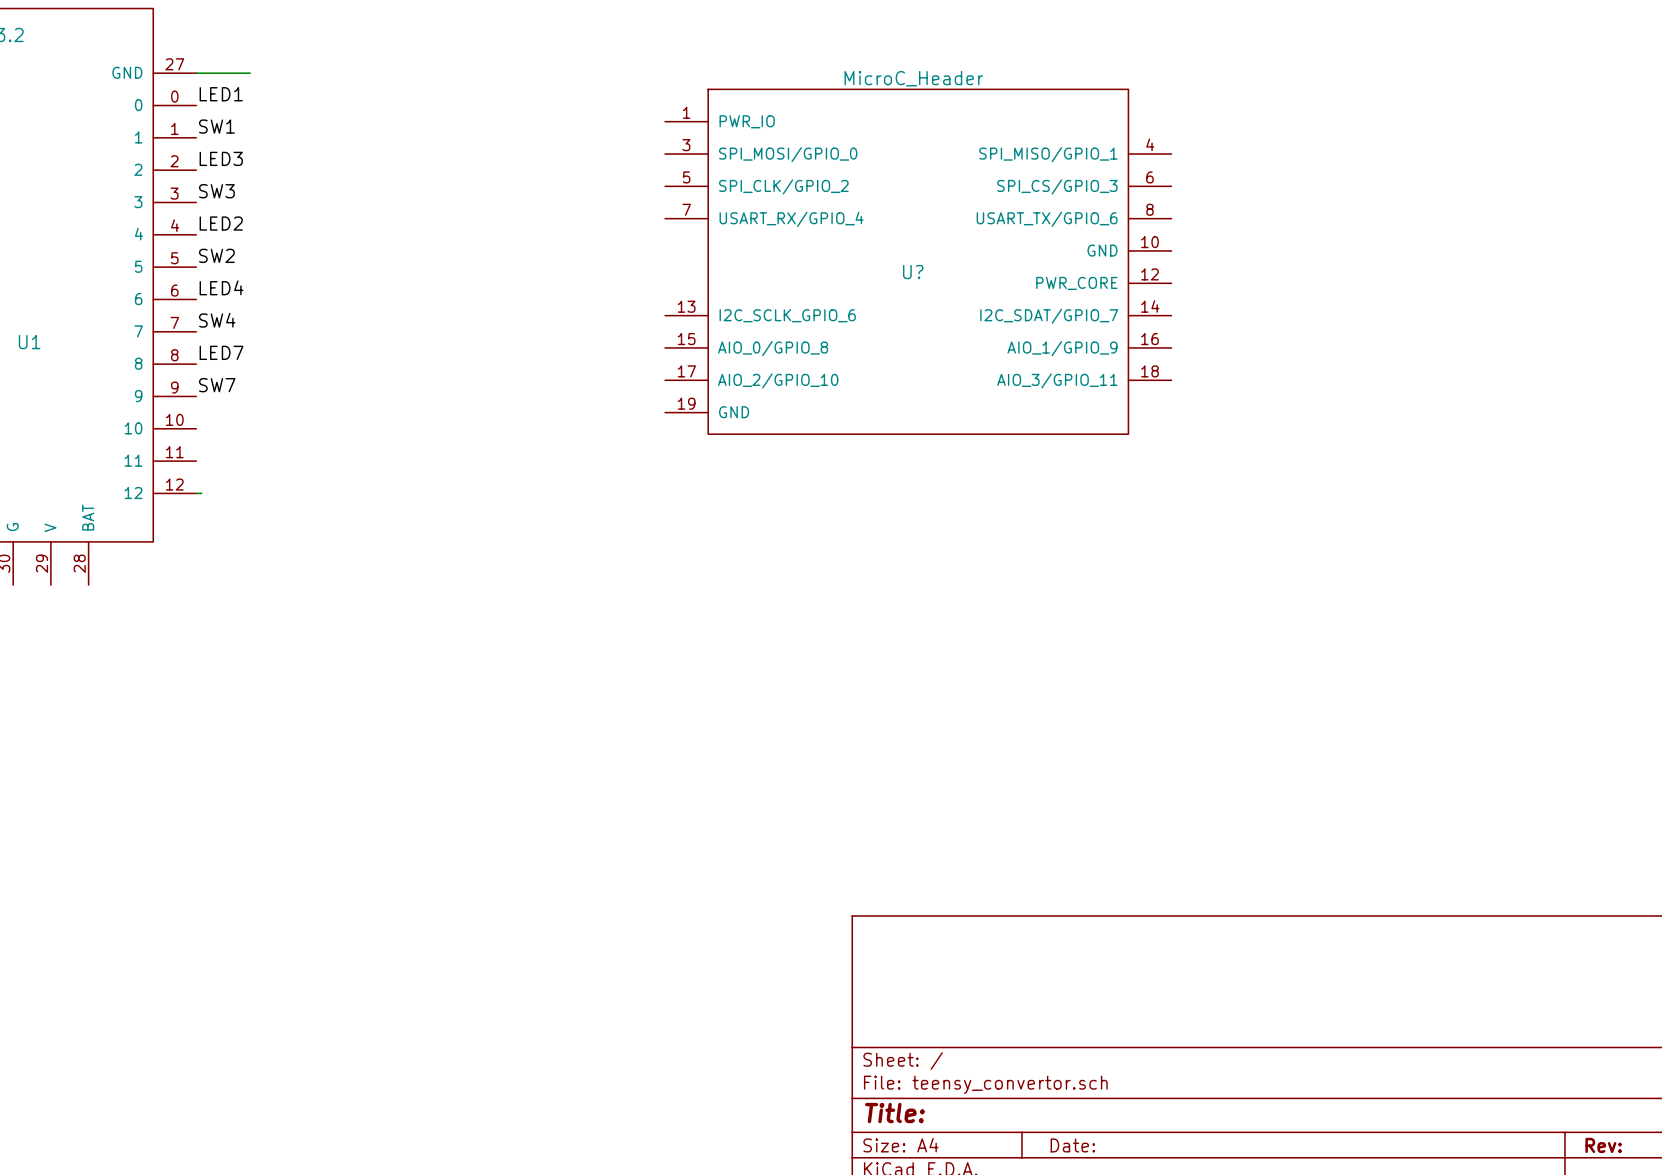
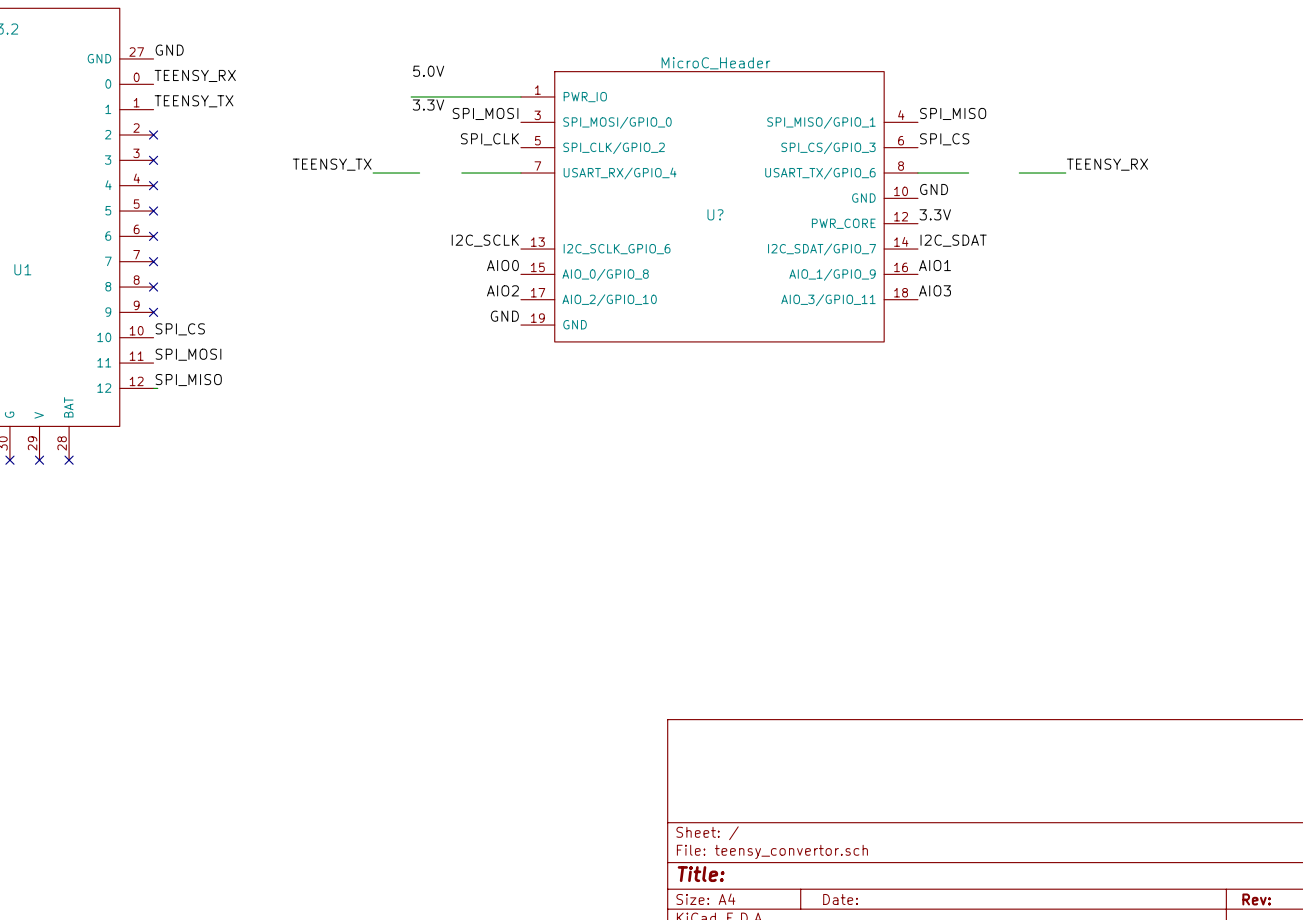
label: none -> GND (169, 50)
wire: (196, 73) (250, 73) -> none
label: none -> 5.0V (428, 71)
label: LED1 (221, 94) -> TEENSY_RX (195, 75)
wire: none -> (411, 96) (520, 96)
label: SW1 (216, 126) -> TEENSY_TX (194, 101)
label: none -> 3.3V (428, 105)
label: none -> SPI_MOSI (485, 113)
label: none -> SPI_MISO (953, 113)
label: LED3 (221, 158) -> none
no-connect mark: none -> (153, 134)
label: none -> SPI_CLK (489, 139)
label: none -> SPI_CS (944, 139)
label: SW3 (216, 191) -> none
no-connect mark: none -> (153, 160)
label: none -> TEENSY_TX (332, 164)
label: none -> TEENSY_RX (1107, 164)
wire: none -> (373, 173) (419, 173)
wire: none -> (461, 173) (520, 173)
wire: none -> (917, 173) (968, 173)
wire: none -> (1019, 173) (1065, 173)
label: LED2 (221, 223) -> none
no-connect mark: none -> (153, 185)
label: none -> GND (934, 189)
label: SW2 (216, 255) -> none
no-connect mark: none -> (153, 211)
label: none -> 3.3V (935, 214)
label: LED4 (221, 287) -> none
no-connect mark: none -> (153, 236)
label: none -> I2C_SCLK (485, 240)
label: none -> I2C_SDAT (953, 240)
label: SW4 (217, 320) -> none
no-connect mark: none -> (153, 261)
label: none -> AIO0 (502, 265)
label: none -> AIO1 (935, 265)
label: LED7 (221, 352) -> none
no-connect mark: none -> (153, 287)
label: none -> AIO2 (502, 290)
label: none -> AIO3 (935, 290)
label: SW7 (217, 385) -> none
no-connect mark: none -> (153, 312)
label: none -> GND (504, 316)
label: none -> SPI_CS (180, 329)
label: none -> SPI_MOSI (188, 354)
label: none -> SPI_MISO (188, 380)
no-connect mark: none -> (9, 460)
no-connect mark: none -> (39, 460)
no-connect mark: none -> (69, 460)

